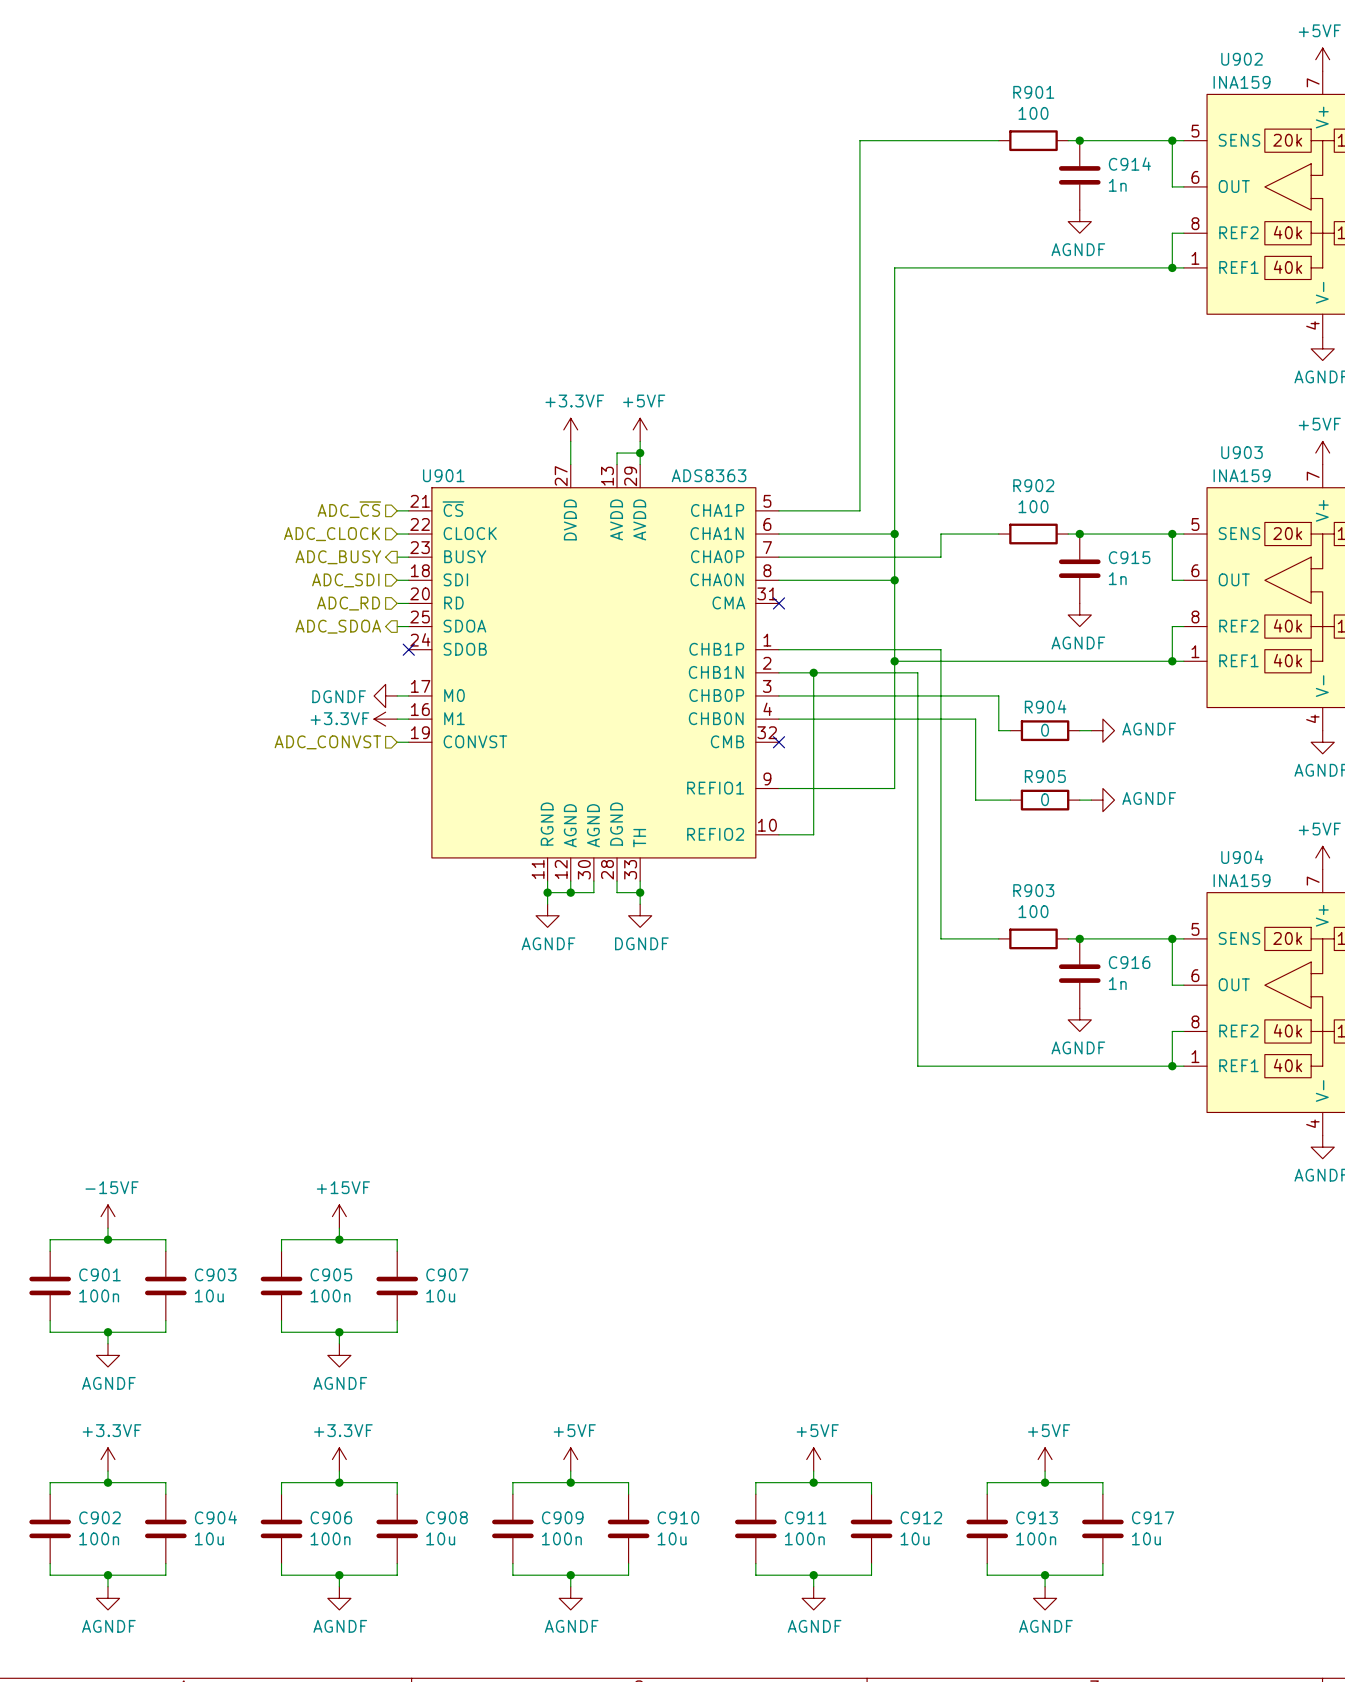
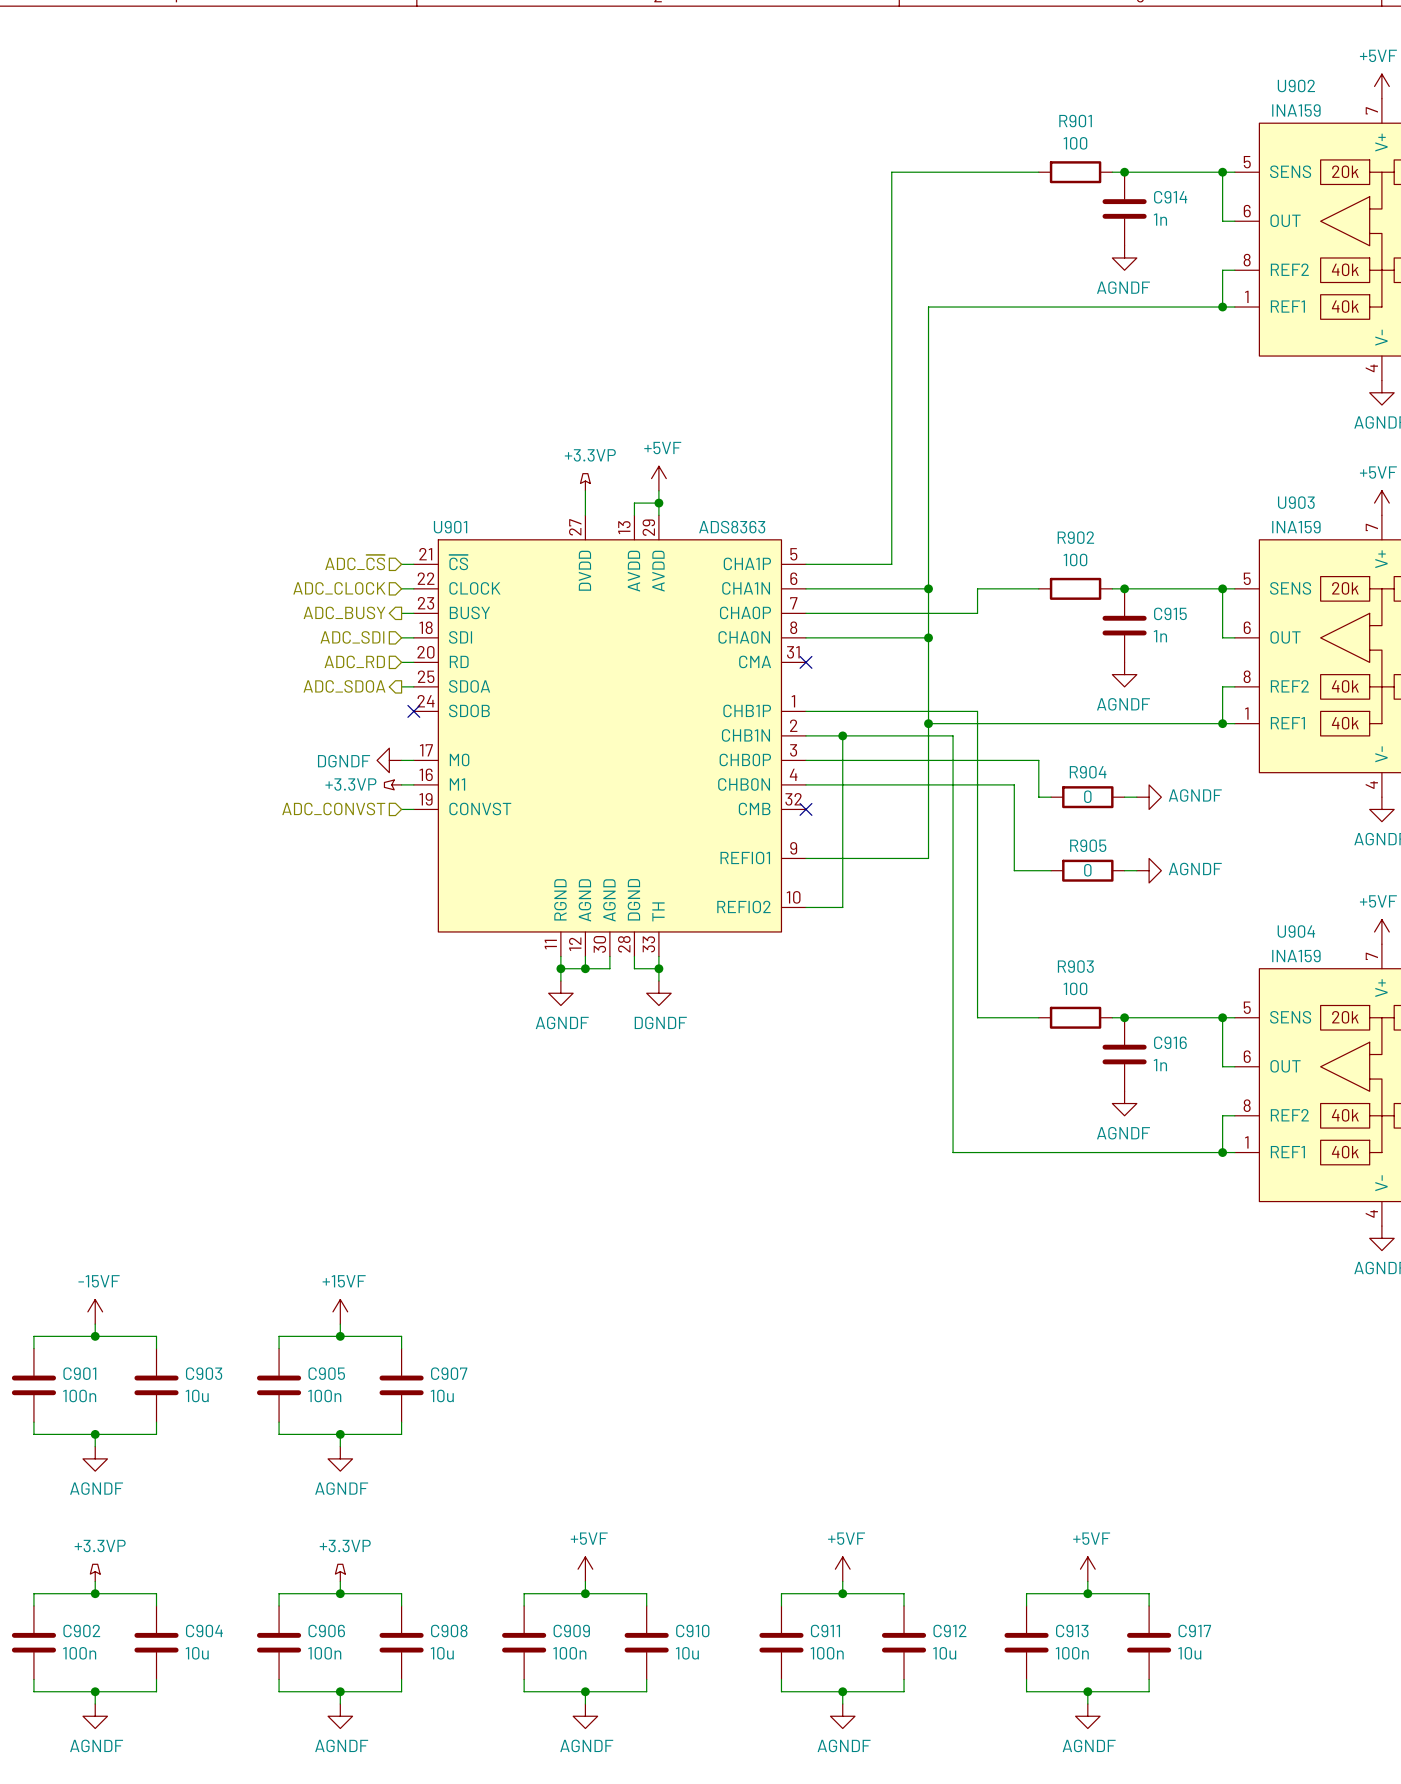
power symbol: +3.3VF (570, 429) -> +3.3VP (585, 482)
power symbol: +3.3VF (385, 719) -> +3.3VP (393, 784)
power symbol: +3.3VF (107, 1459) -> +3.3VP (95, 1572)
power symbol: +3.3VF (339, 1459) -> +3.3VP (340, 1572)

